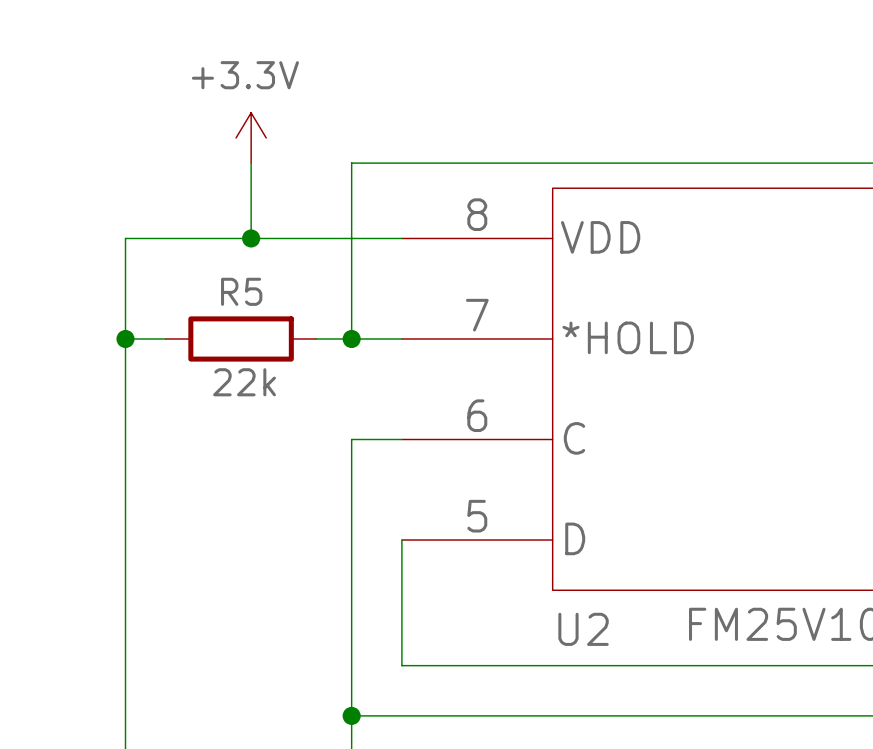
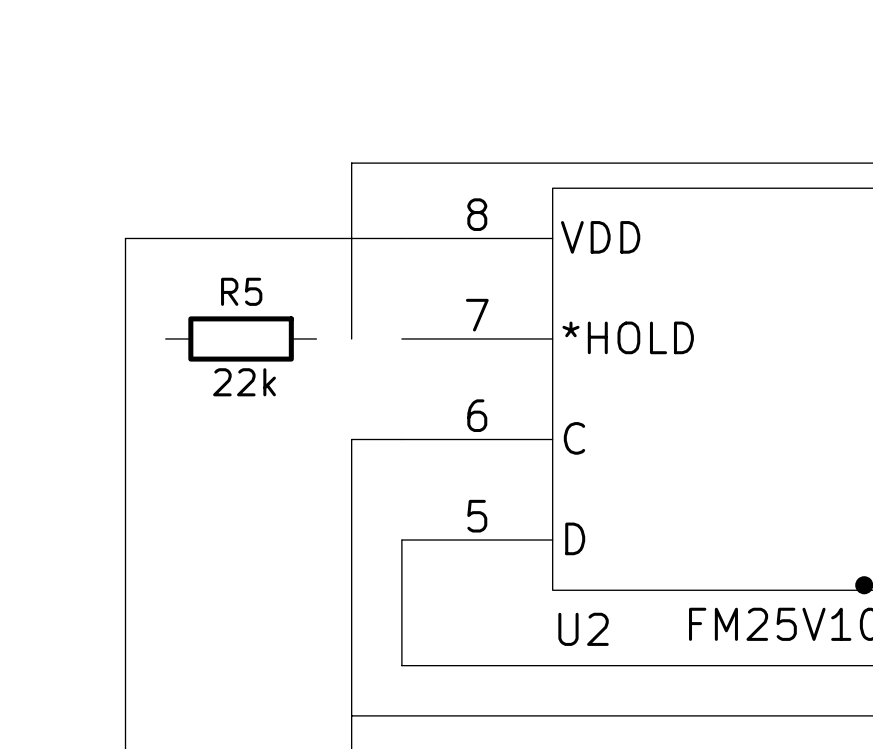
power symbol: +3.3V (251, 137) -> none
wire: (251, 163) (251, 238) -> none
junction: (251, 238) -> none
wire: (125, 338) (165, 338) -> none
junction: (125, 338) -> none
wire: (316, 338) (401, 338) -> none
junction: (351, 338) -> none
junction: none -> (864, 585)
junction: (351, 715) -> none

